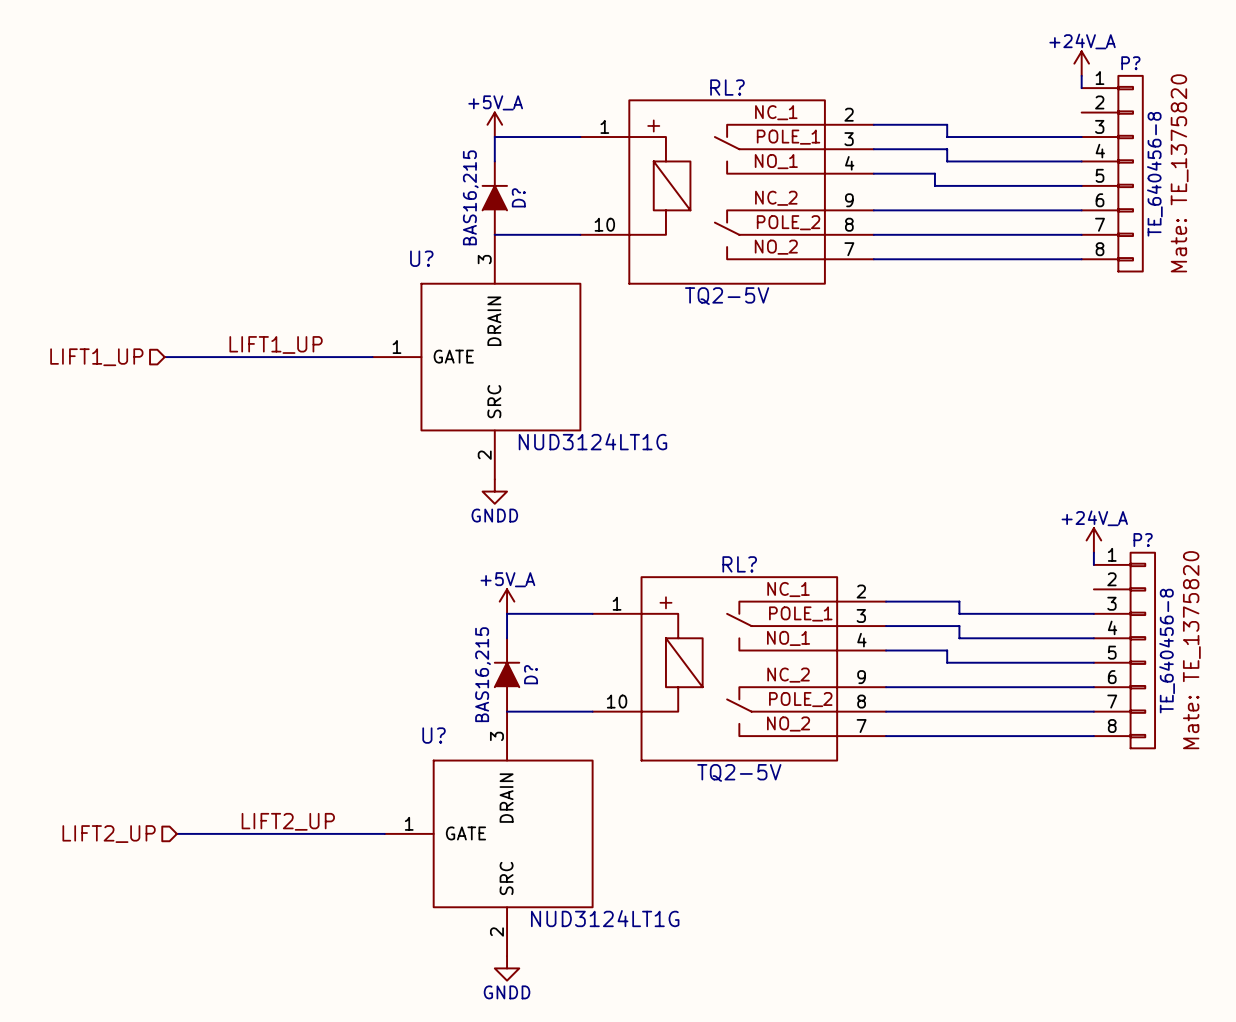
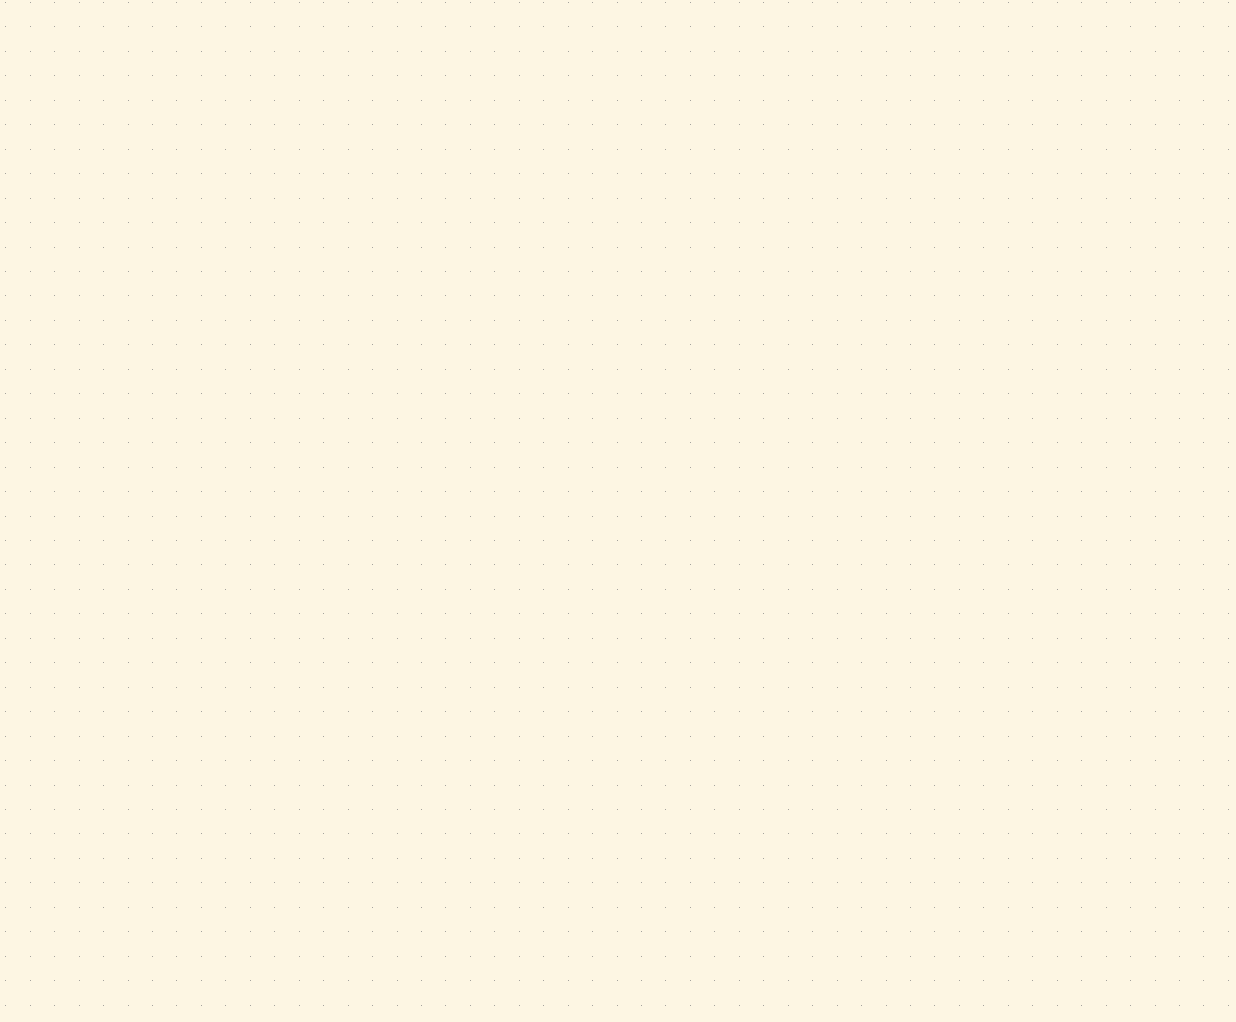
power symbol: +24V_A (1081, 63) -> none
wire: (1081, 75) (1081, 88) -> none
power symbol: +5V_A (494, 124) -> none
wire: (873, 124) (947, 124) (947, 137) (1081, 137) -> none
wire: (580, 137) (494, 137) (494, 161) -> none
wire: (873, 149) (947, 149) (947, 161) (1081, 161) -> none
wire: (873, 173) (934, 173) (934, 185) (1081, 185) -> none
P?: TE_640456-8 (1112, 173) -> none
RL?: TQ2-5V (727, 192) -> none
D?: BAS16,215 (494, 198) -> none
wire: (873, 210) (1081, 210) -> none
wire: (494, 234) (580, 234) -> none
wire: (873, 234) (1081, 234) -> none
wire: (873, 259) (1081, 259) -> none
label: LIFT1_UP (276, 344) -> none
hierarchical label: LIFT1_UP (96, 357) -> none
wire: (164, 357) (372, 357) -> none
U?: NUD3124LT1G (476, 357) -> none
power symbol: GNDD (494, 491) -> none
power symbol: +24V_A (1093, 540) -> none
wire: (1093, 552) (1093, 564) -> none
power symbol: +5V_A (507, 601) -> none
wire: (886, 601) (959, 601) (959, 613) (1093, 613) -> none
wire: (592, 613) (507, 613) (507, 638) -> none
wire: (886, 626) (959, 626) (959, 638) (1093, 638) -> none
wire: (886, 650) (947, 650) (947, 662) (1093, 662) -> none
P?: TE_640456-8 (1124, 650) -> none
RL?: TQ2-5V (739, 668) -> none
D?: BAS16,215 (507, 674) -> none
wire: (886, 687) (1093, 687) -> none
wire: (507, 711) (592, 711) -> none
wire: (886, 711) (1093, 711) -> none
wire: (886, 736) (1093, 736) -> none
label: LIFT2_UP (288, 821) -> none
wire: (176, 833) (384, 833) -> none
U?: NUD3124LT1G (488, 833) -> none
hierarchical label: LIFT2_UP (109, 834) -> none
power symbol: GNDD (507, 968) -> none

